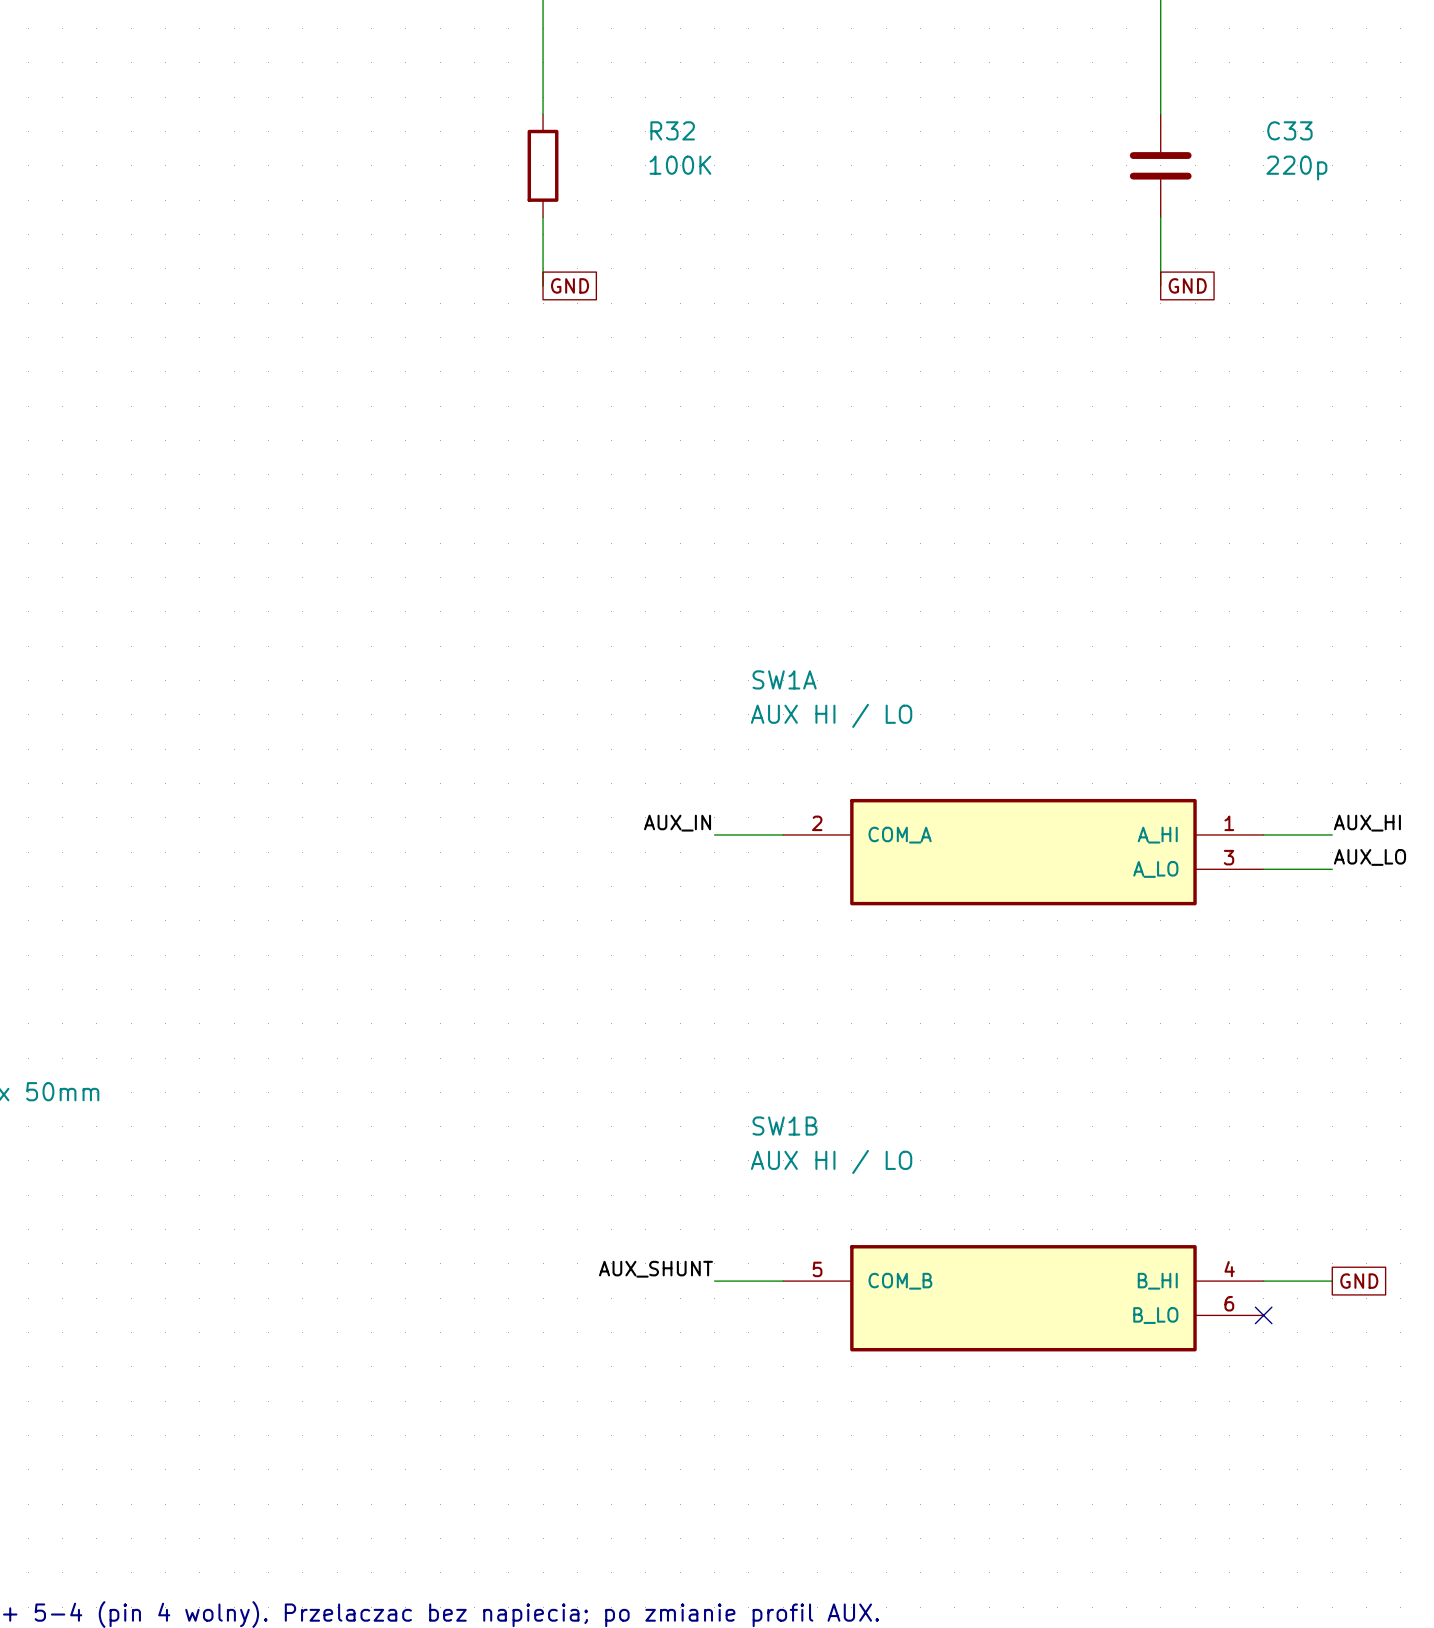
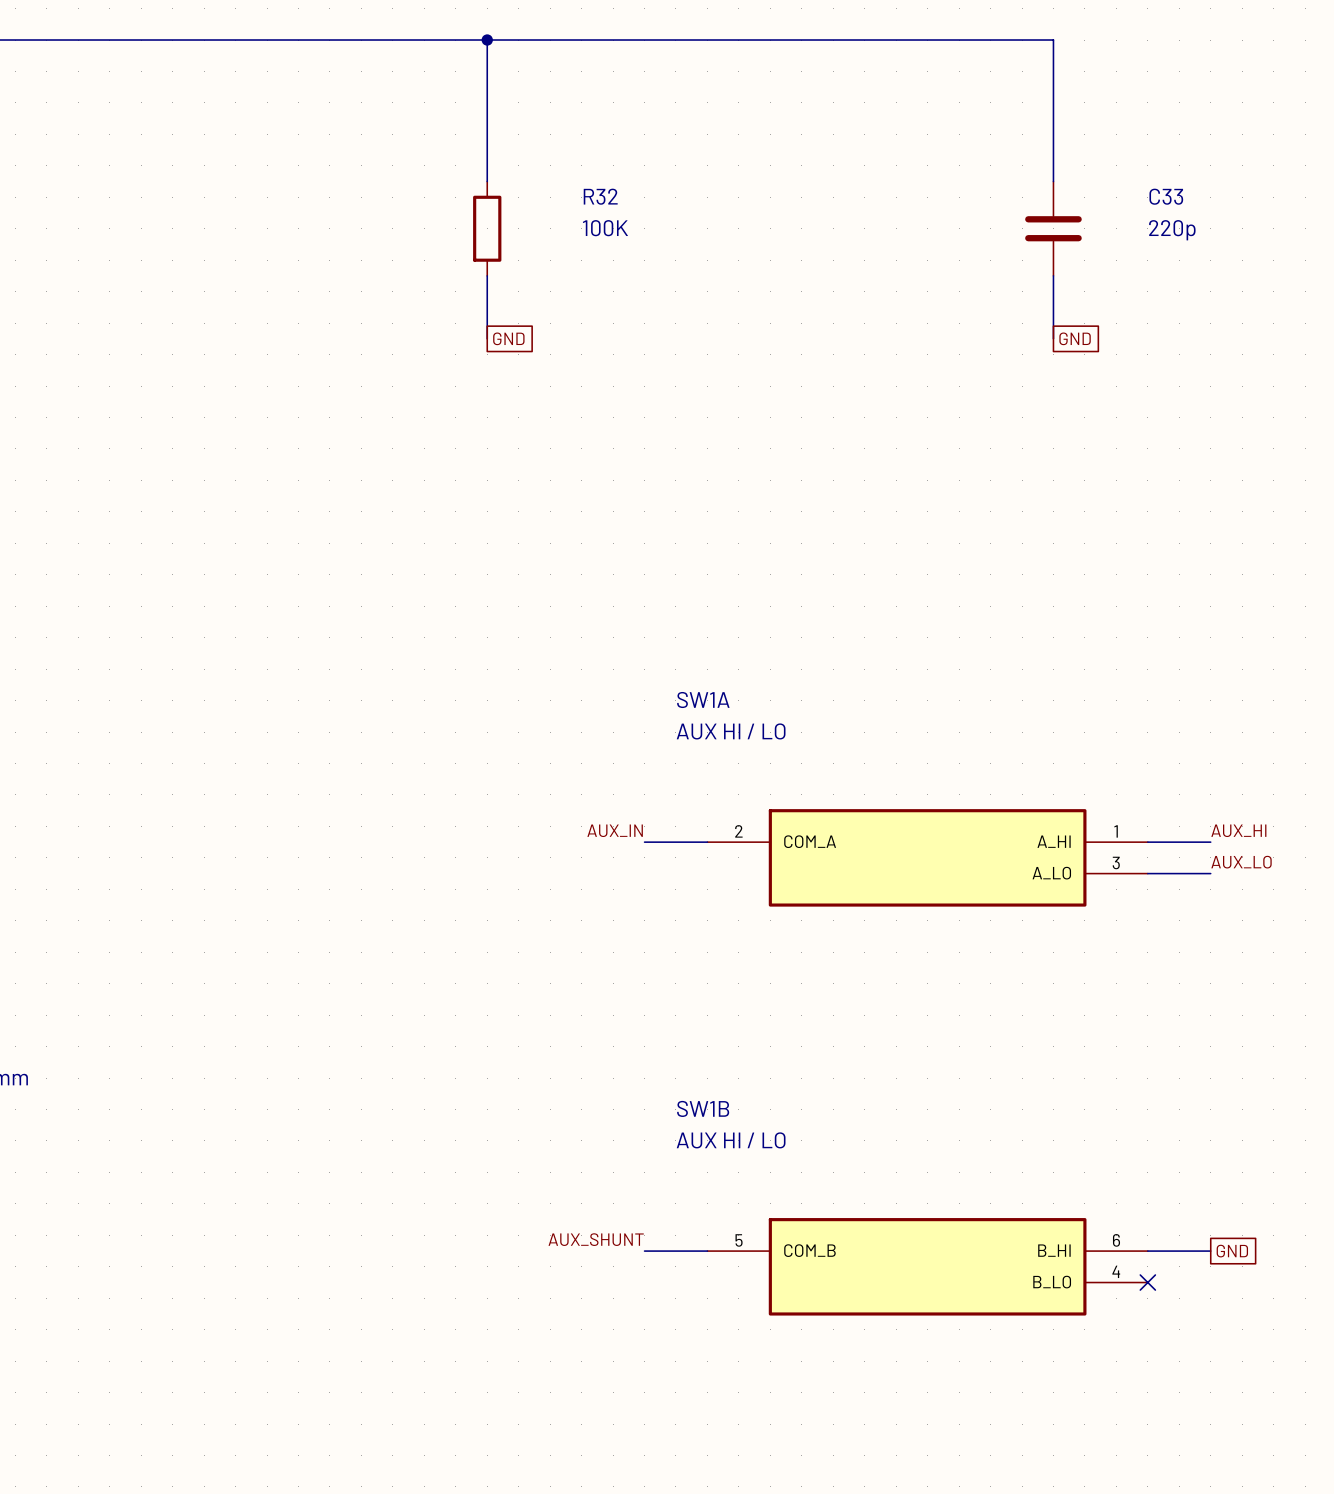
SW1B pin number: 4 (1229, 1269) -> 6 (1116, 1240)
SW1B pin number: 6 (1229, 1303) -> 4 (1116, 1271)

